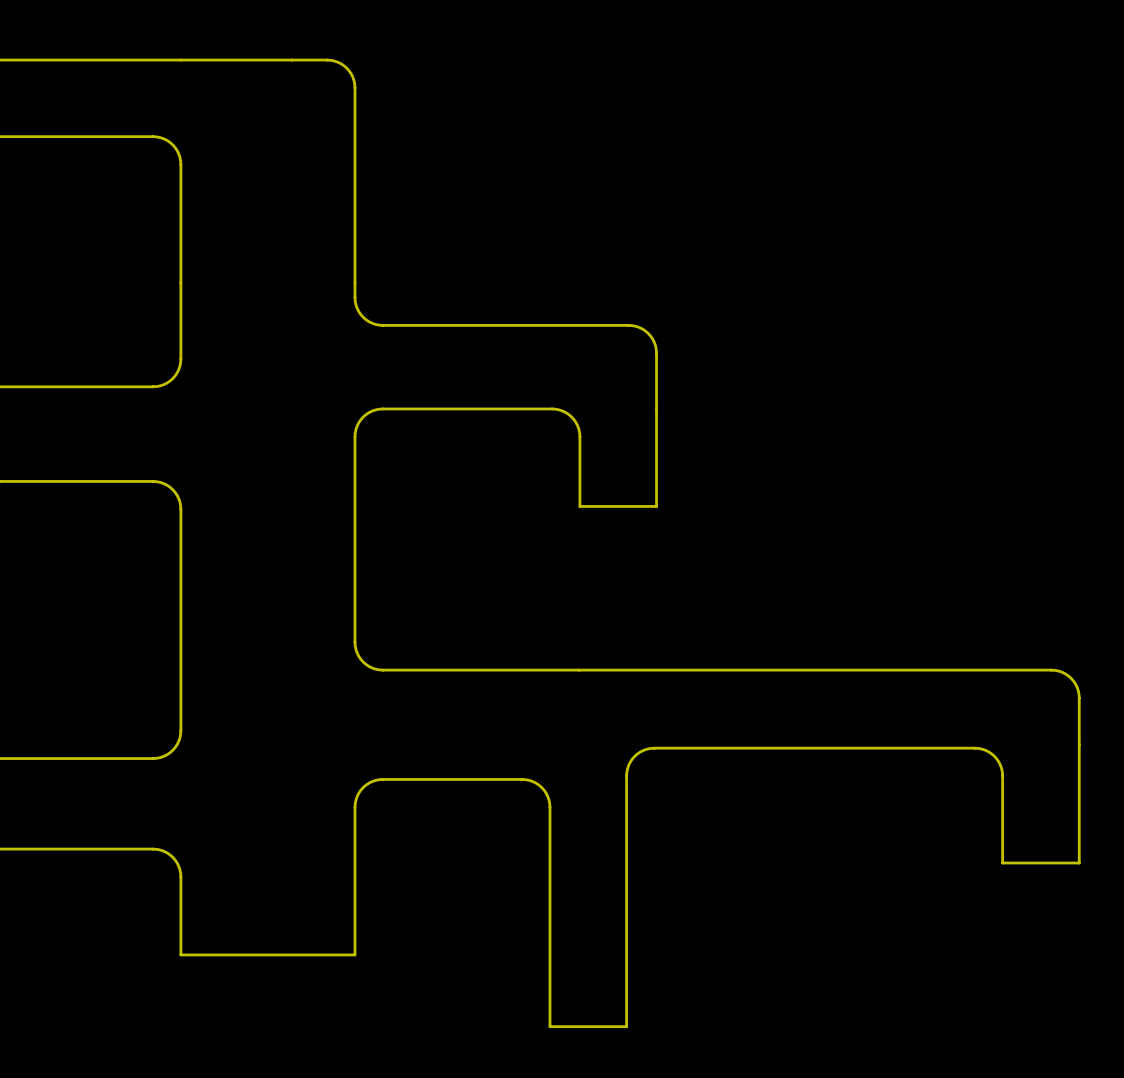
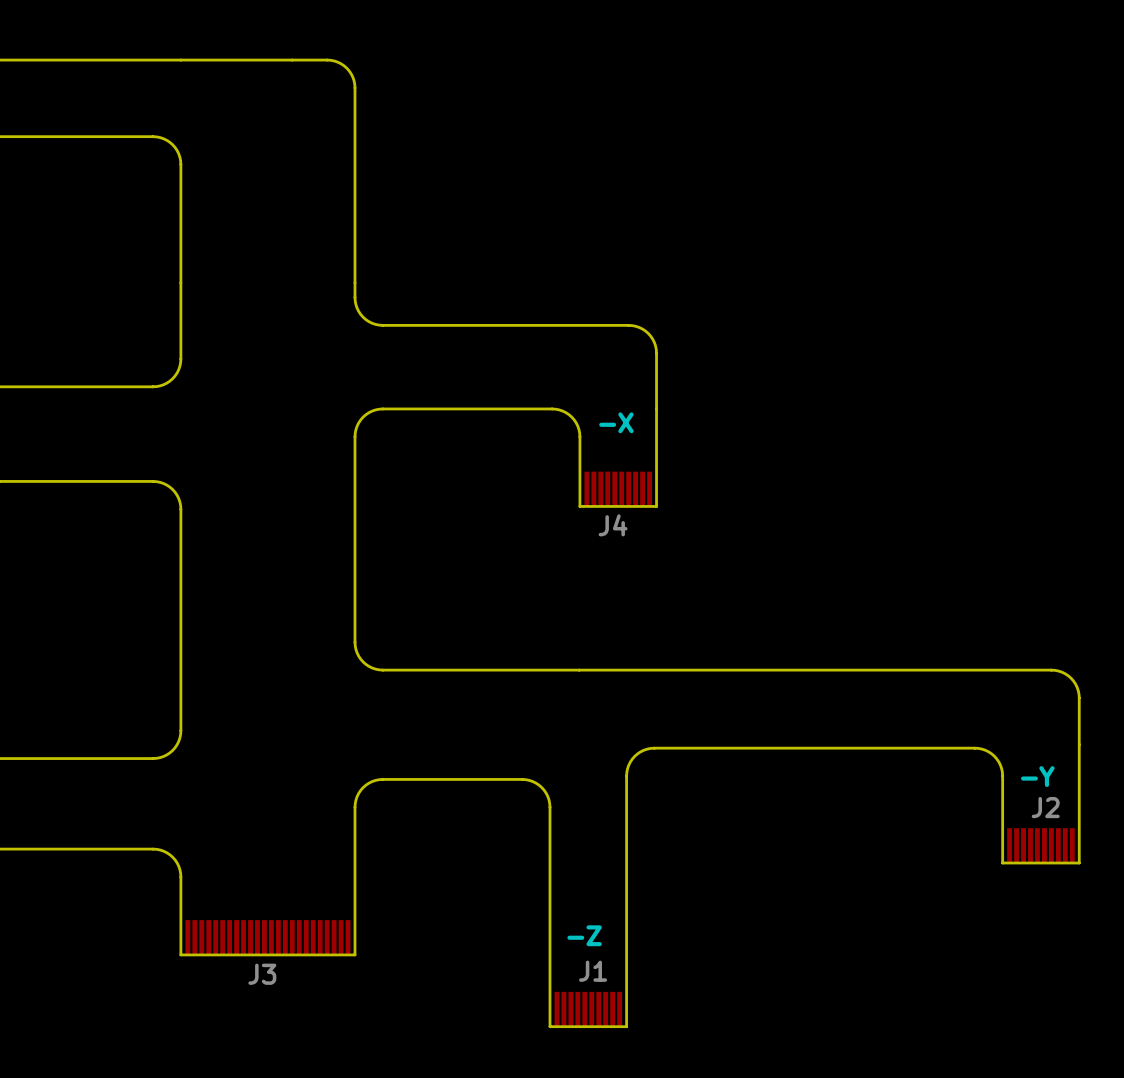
text: none -> -X (616, 422)
J4: none -> (618, 489)
text: none -> -Y (1037, 776)
J2: none -> (1040, 845)
text: none -> -Z (584, 935)
J3: none -> (267, 937)
J1: none -> (588, 1009)

